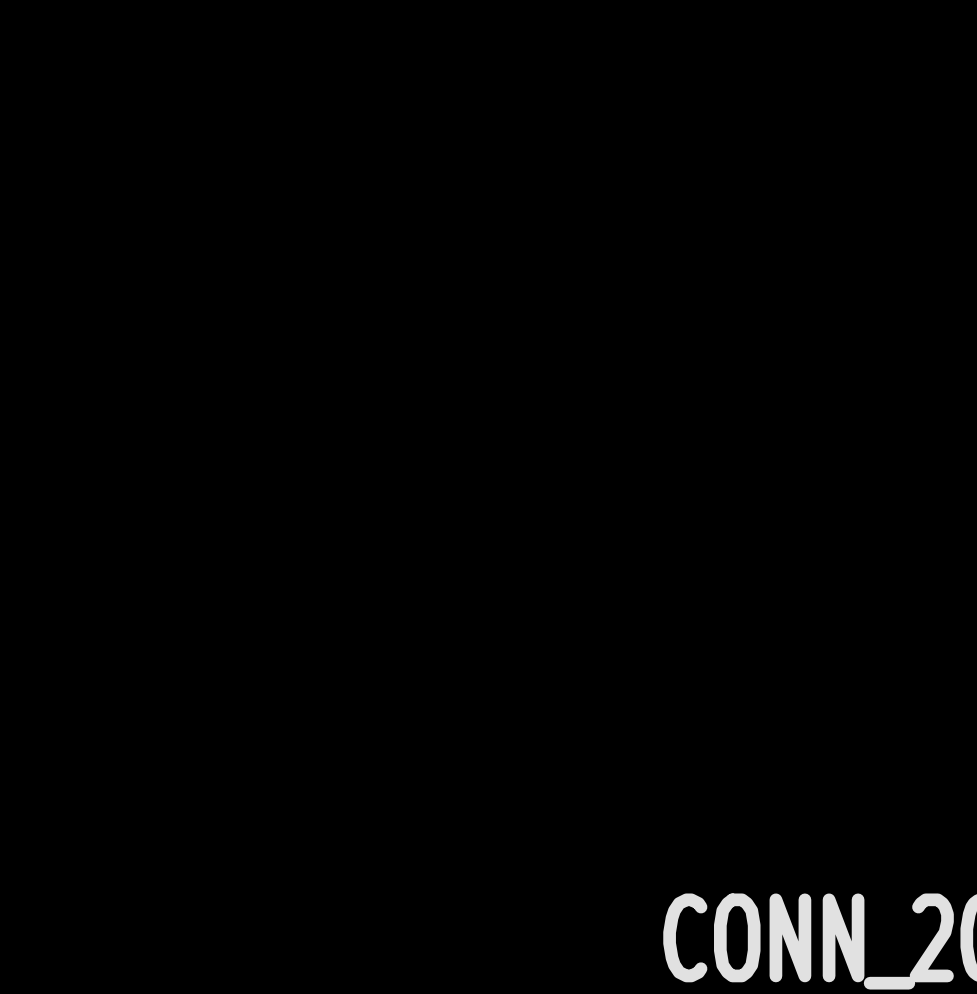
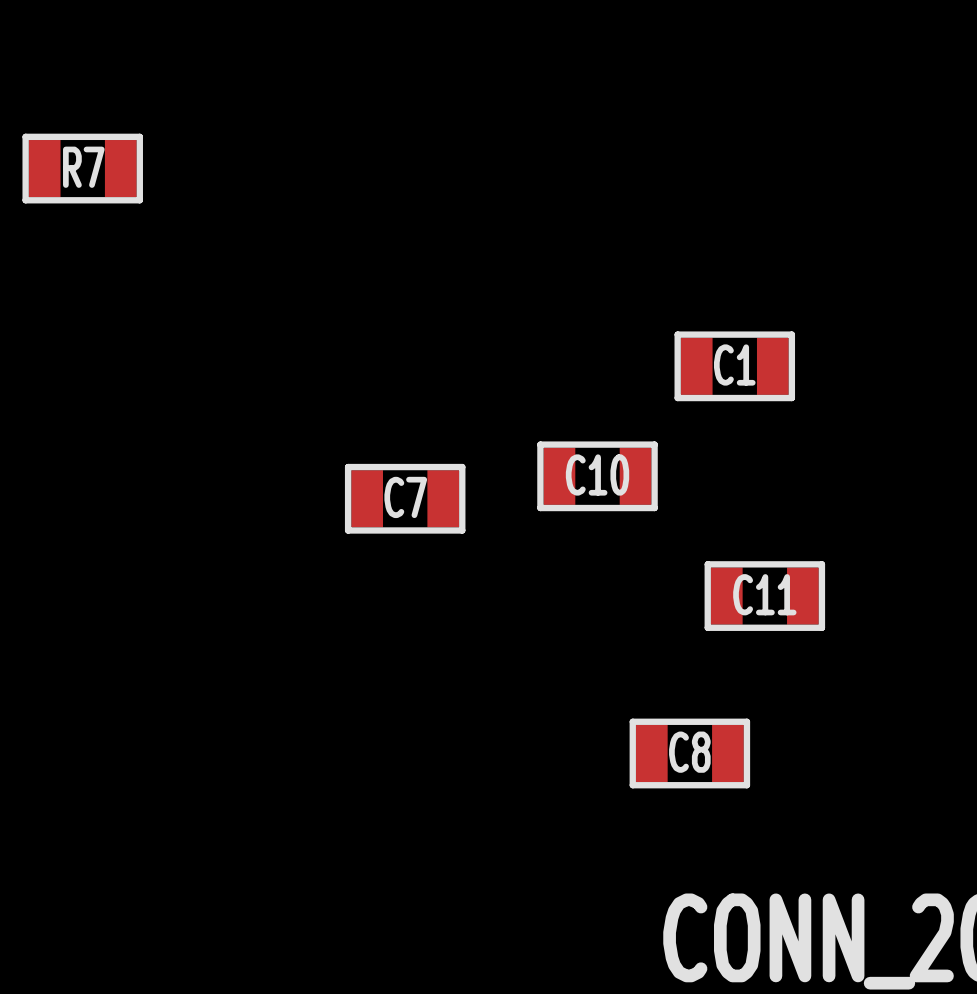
R7: none -> (82, 168)
C1: none -> (734, 366)
C10: none -> (597, 476)
C7: none -> (405, 498)
C11: none -> (764, 596)
C8: none -> (689, 753)

